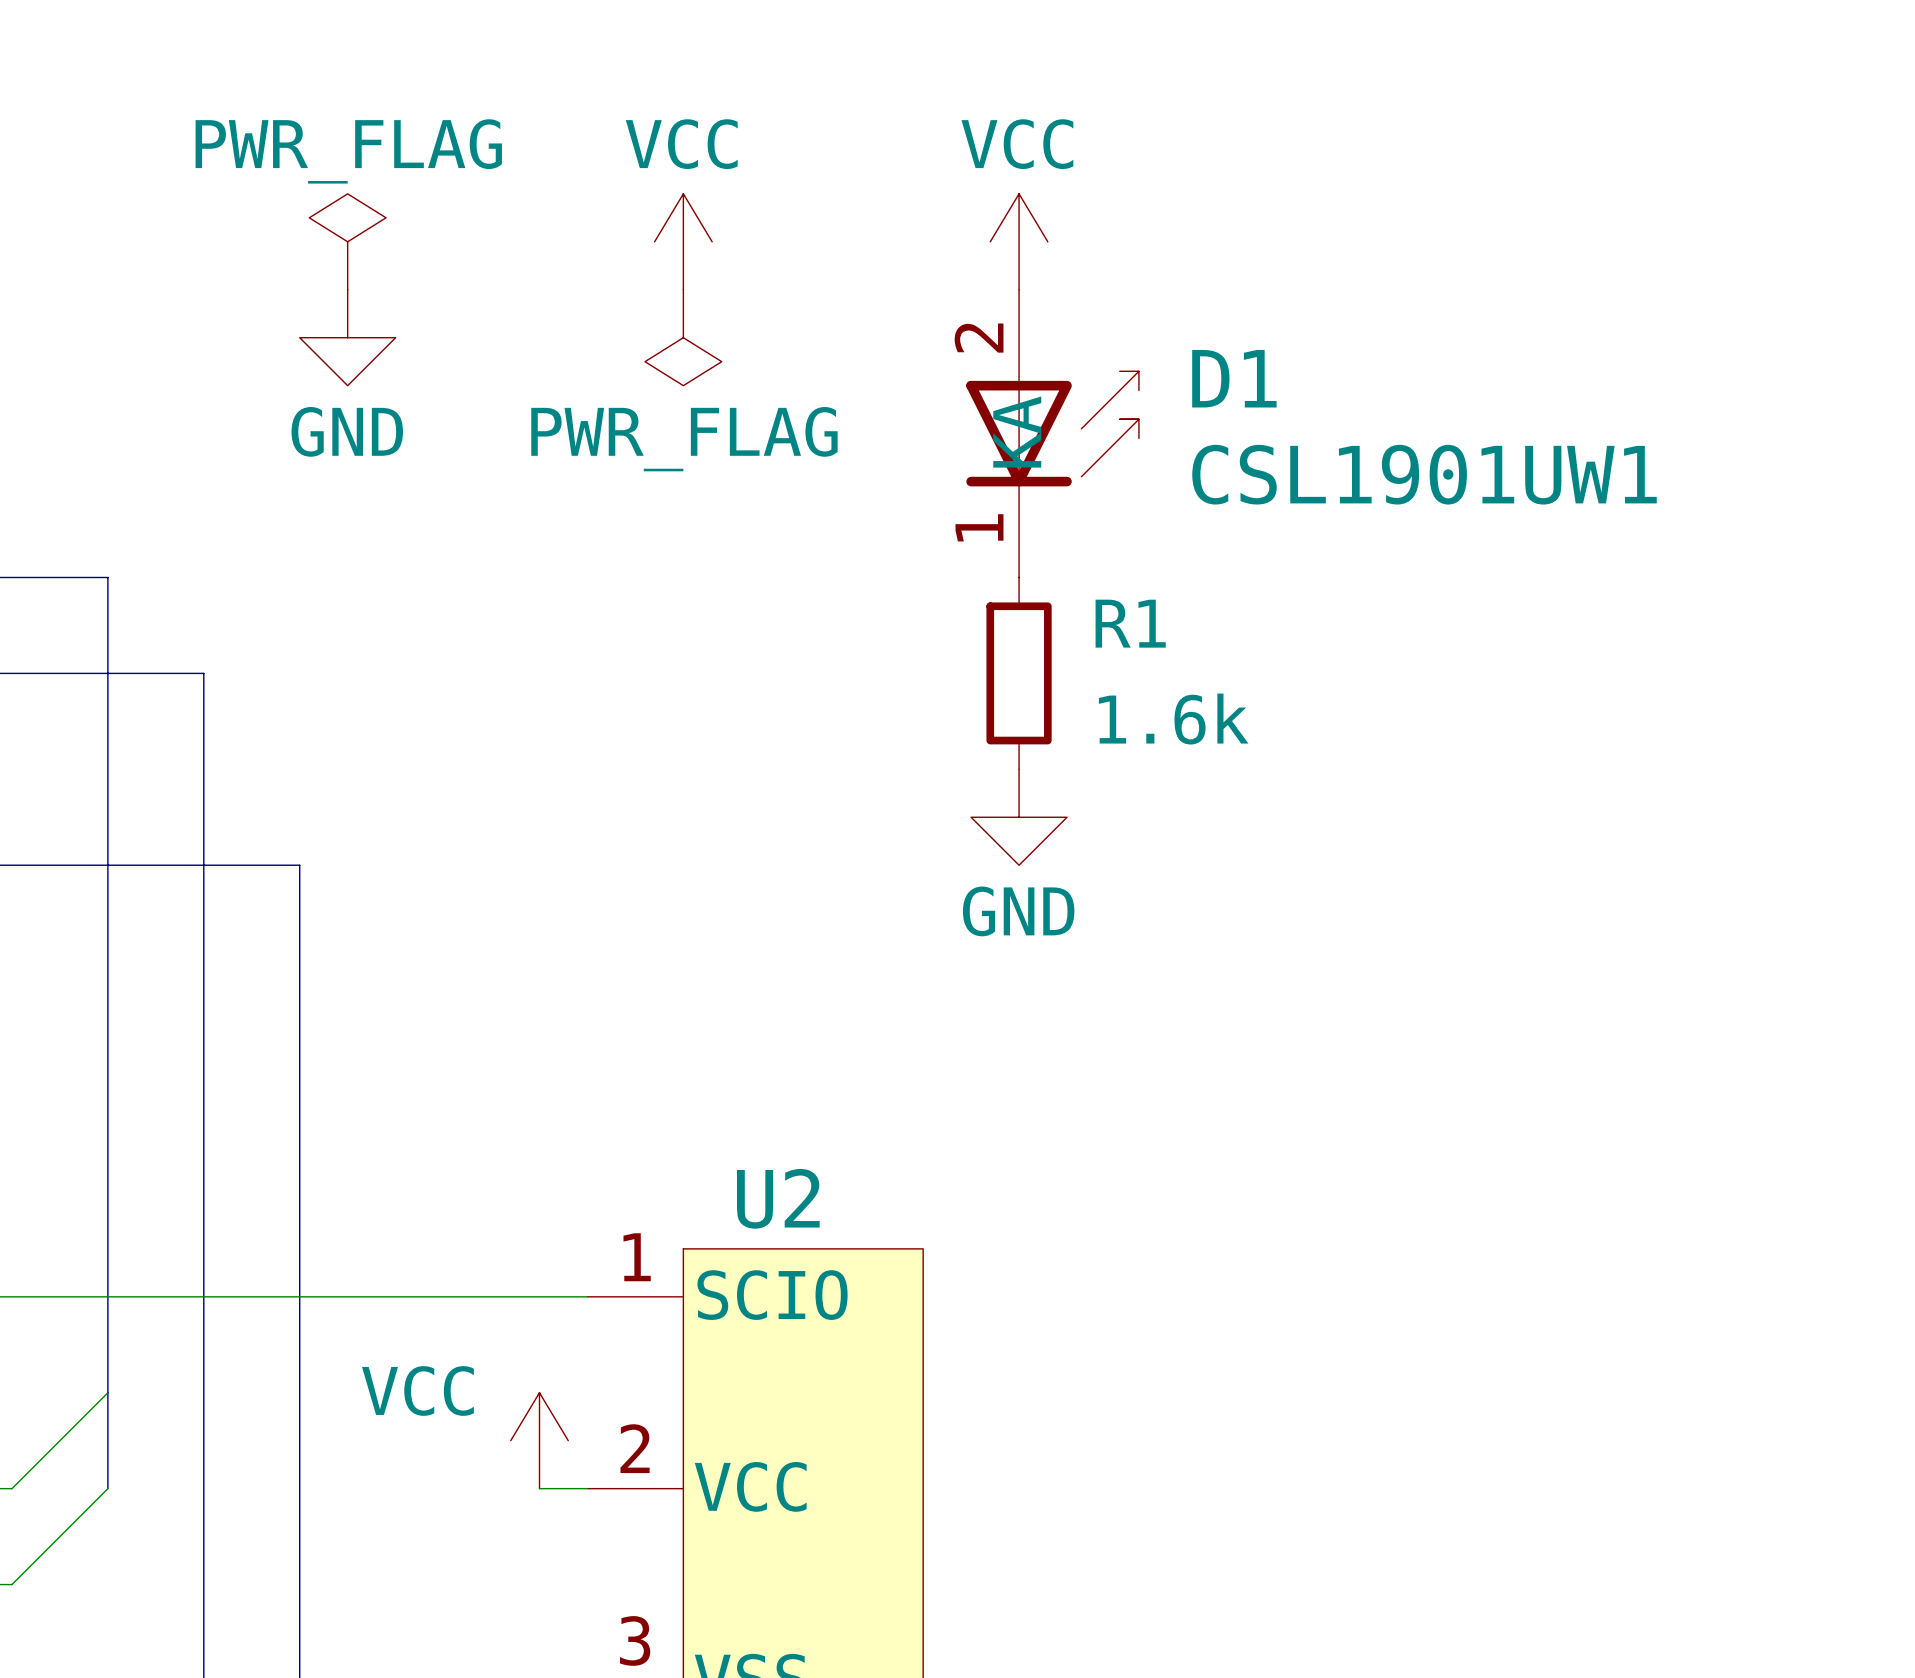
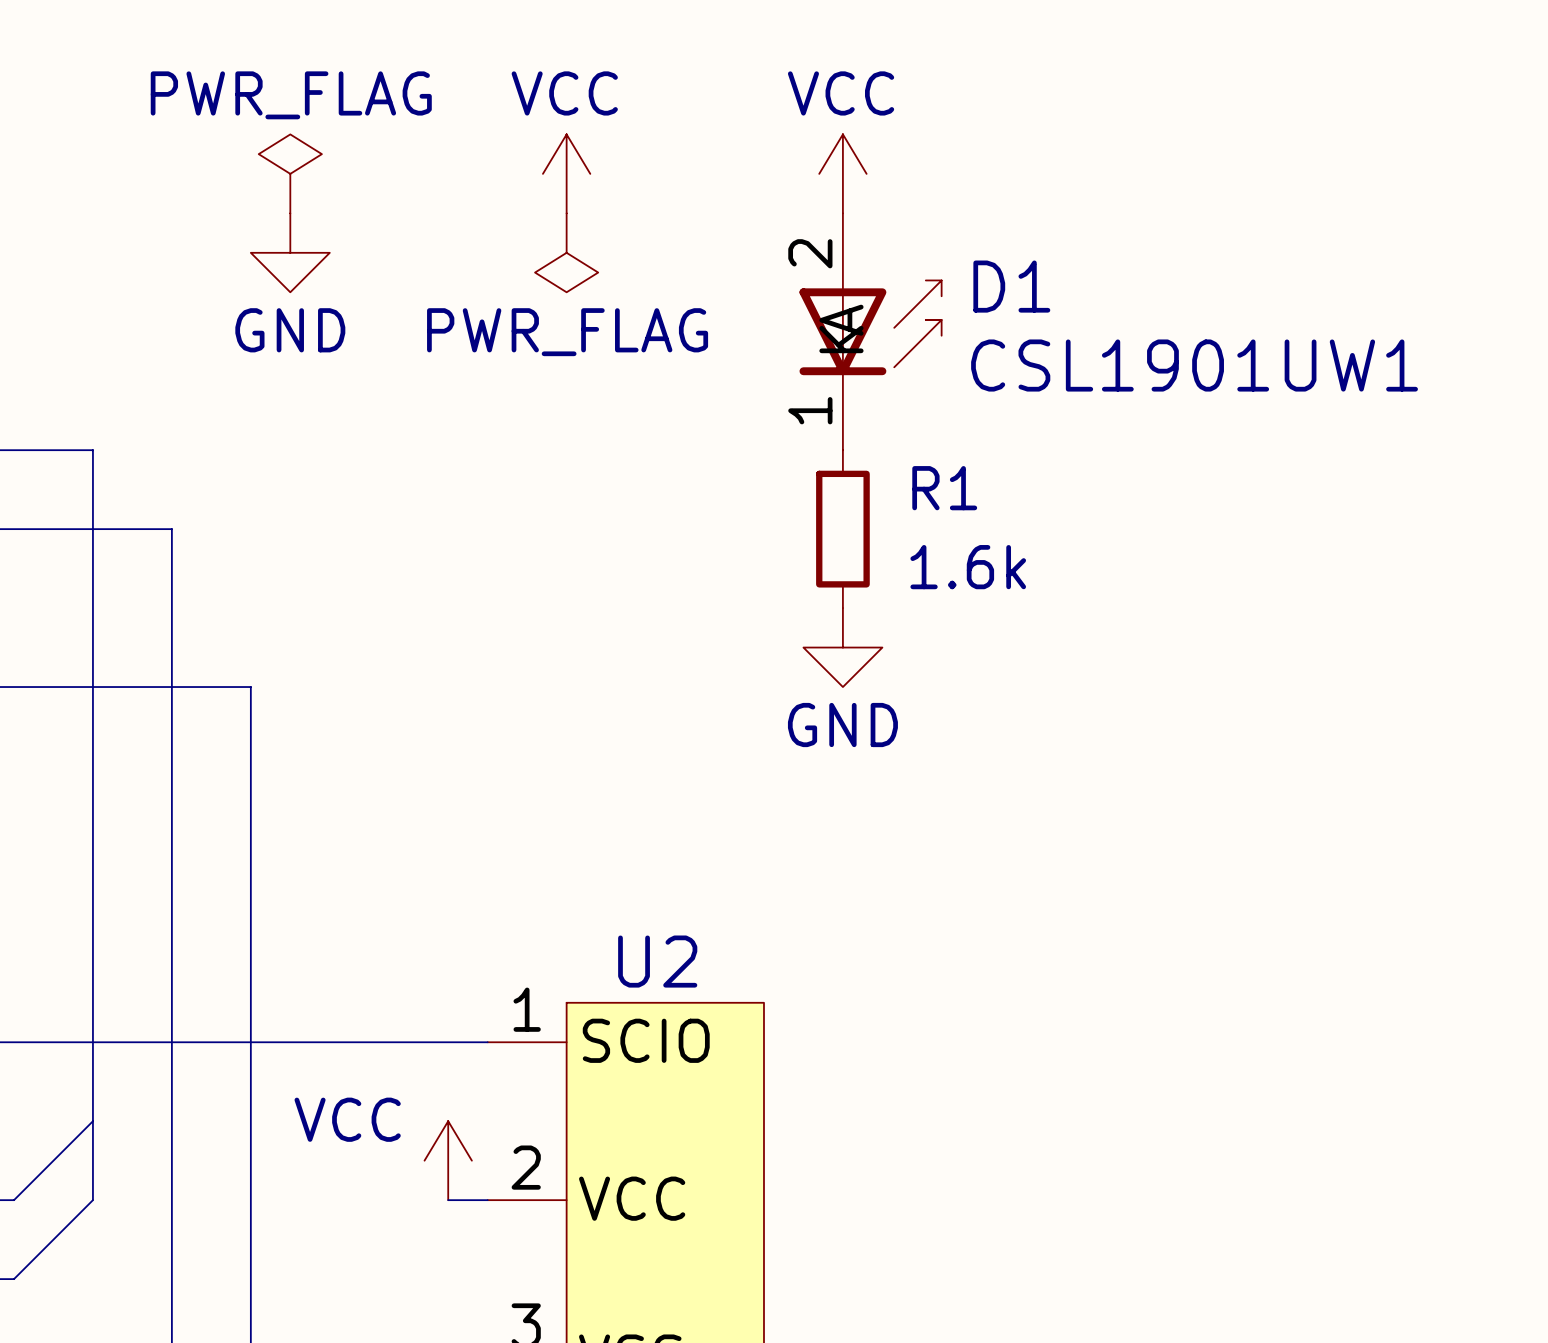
D1 name position: D1 (1234, 378) -> D1 (1011, 286)
D1 value position: CSL1901UW1 (1424, 474) -> CSL1901UW1 (1194, 365)

